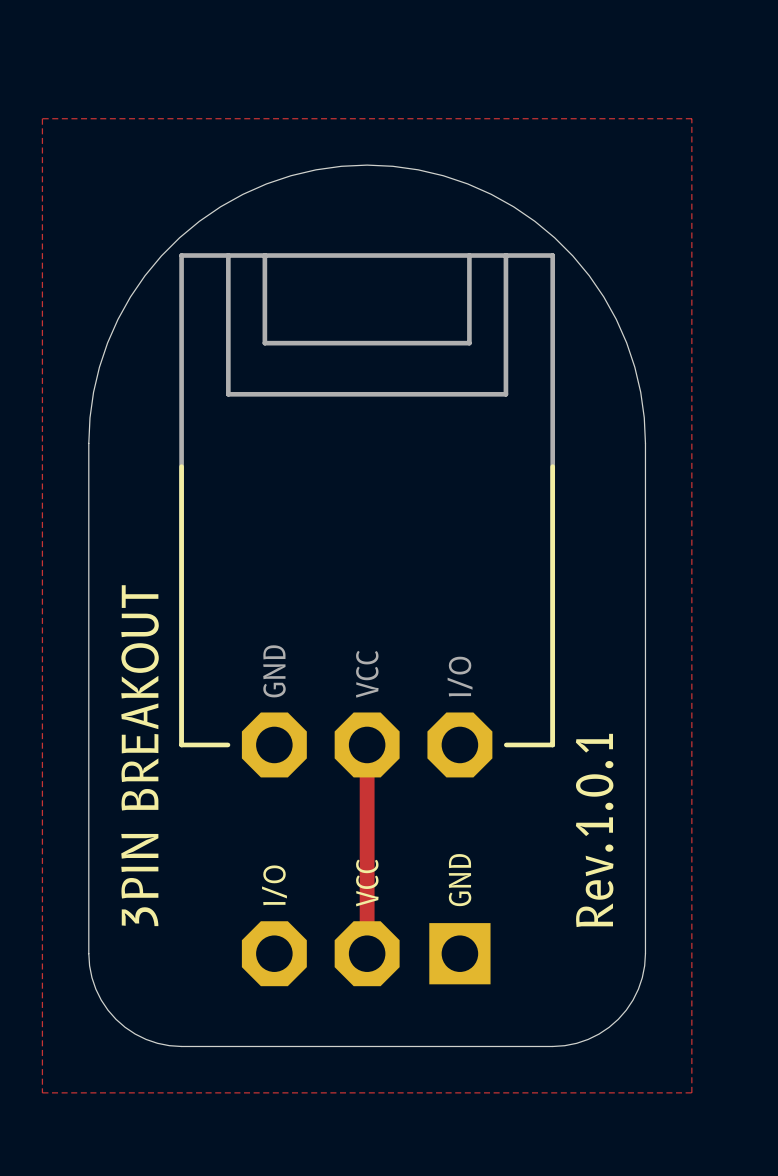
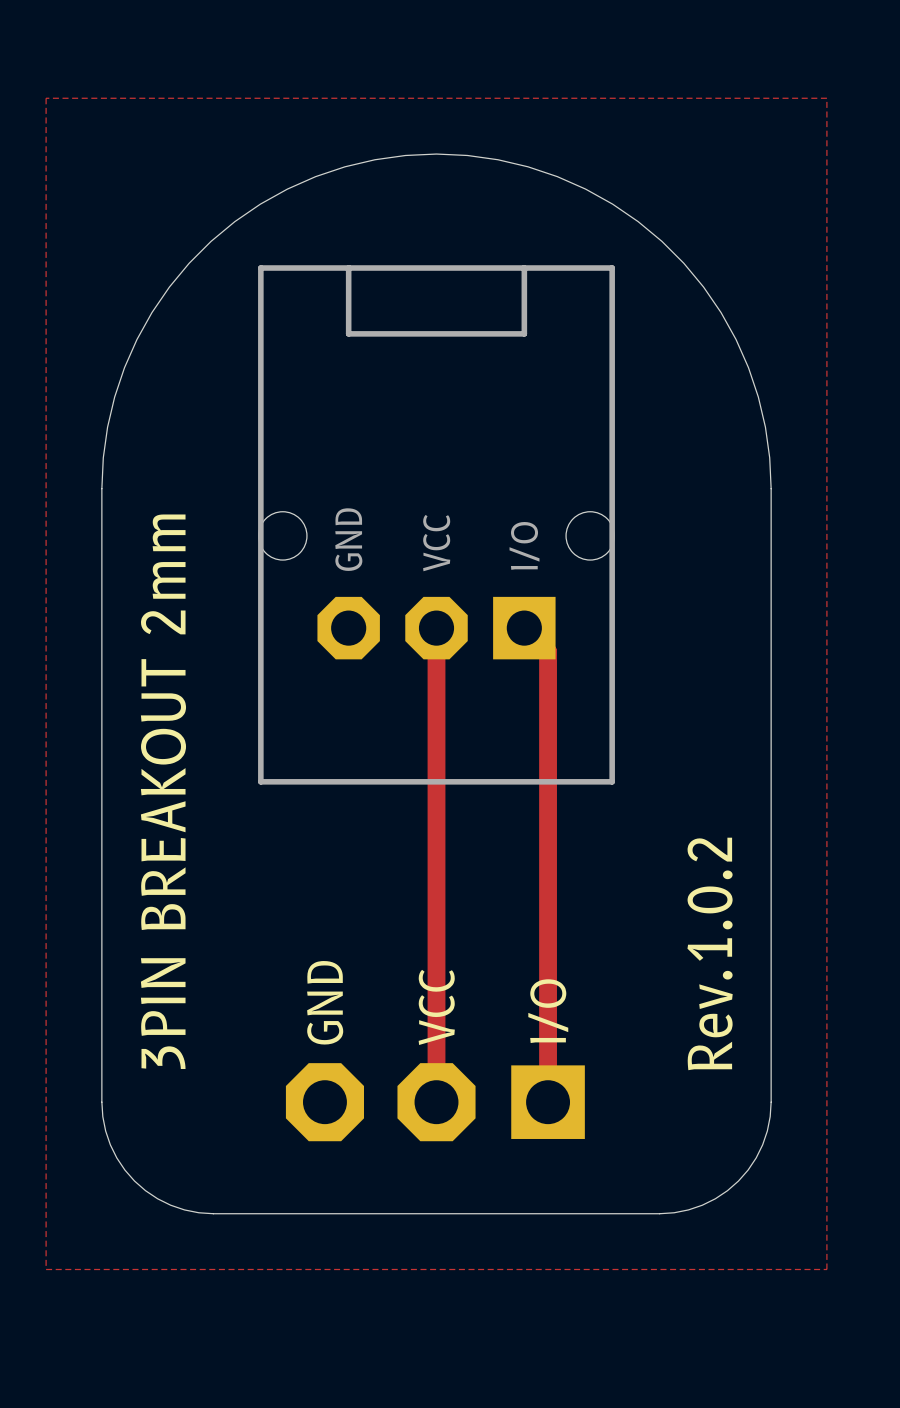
part footprint: [88, 165, 646, 1047] -> [101, 154, 772, 1214]
part: none -> (436, 524)
part: (367, 515) -> none
track: none -> (436, 628) (436, 851)
track: none -> (524, 628) (548, 651) (548, 1102)
text: 3PIN BREAKOUT (140, 755) -> 3PIN BREAKOUT 2mm (163, 791)
text: Rev.1.0.1 (594, 830) -> Rev.1.0.2 (710, 953)

